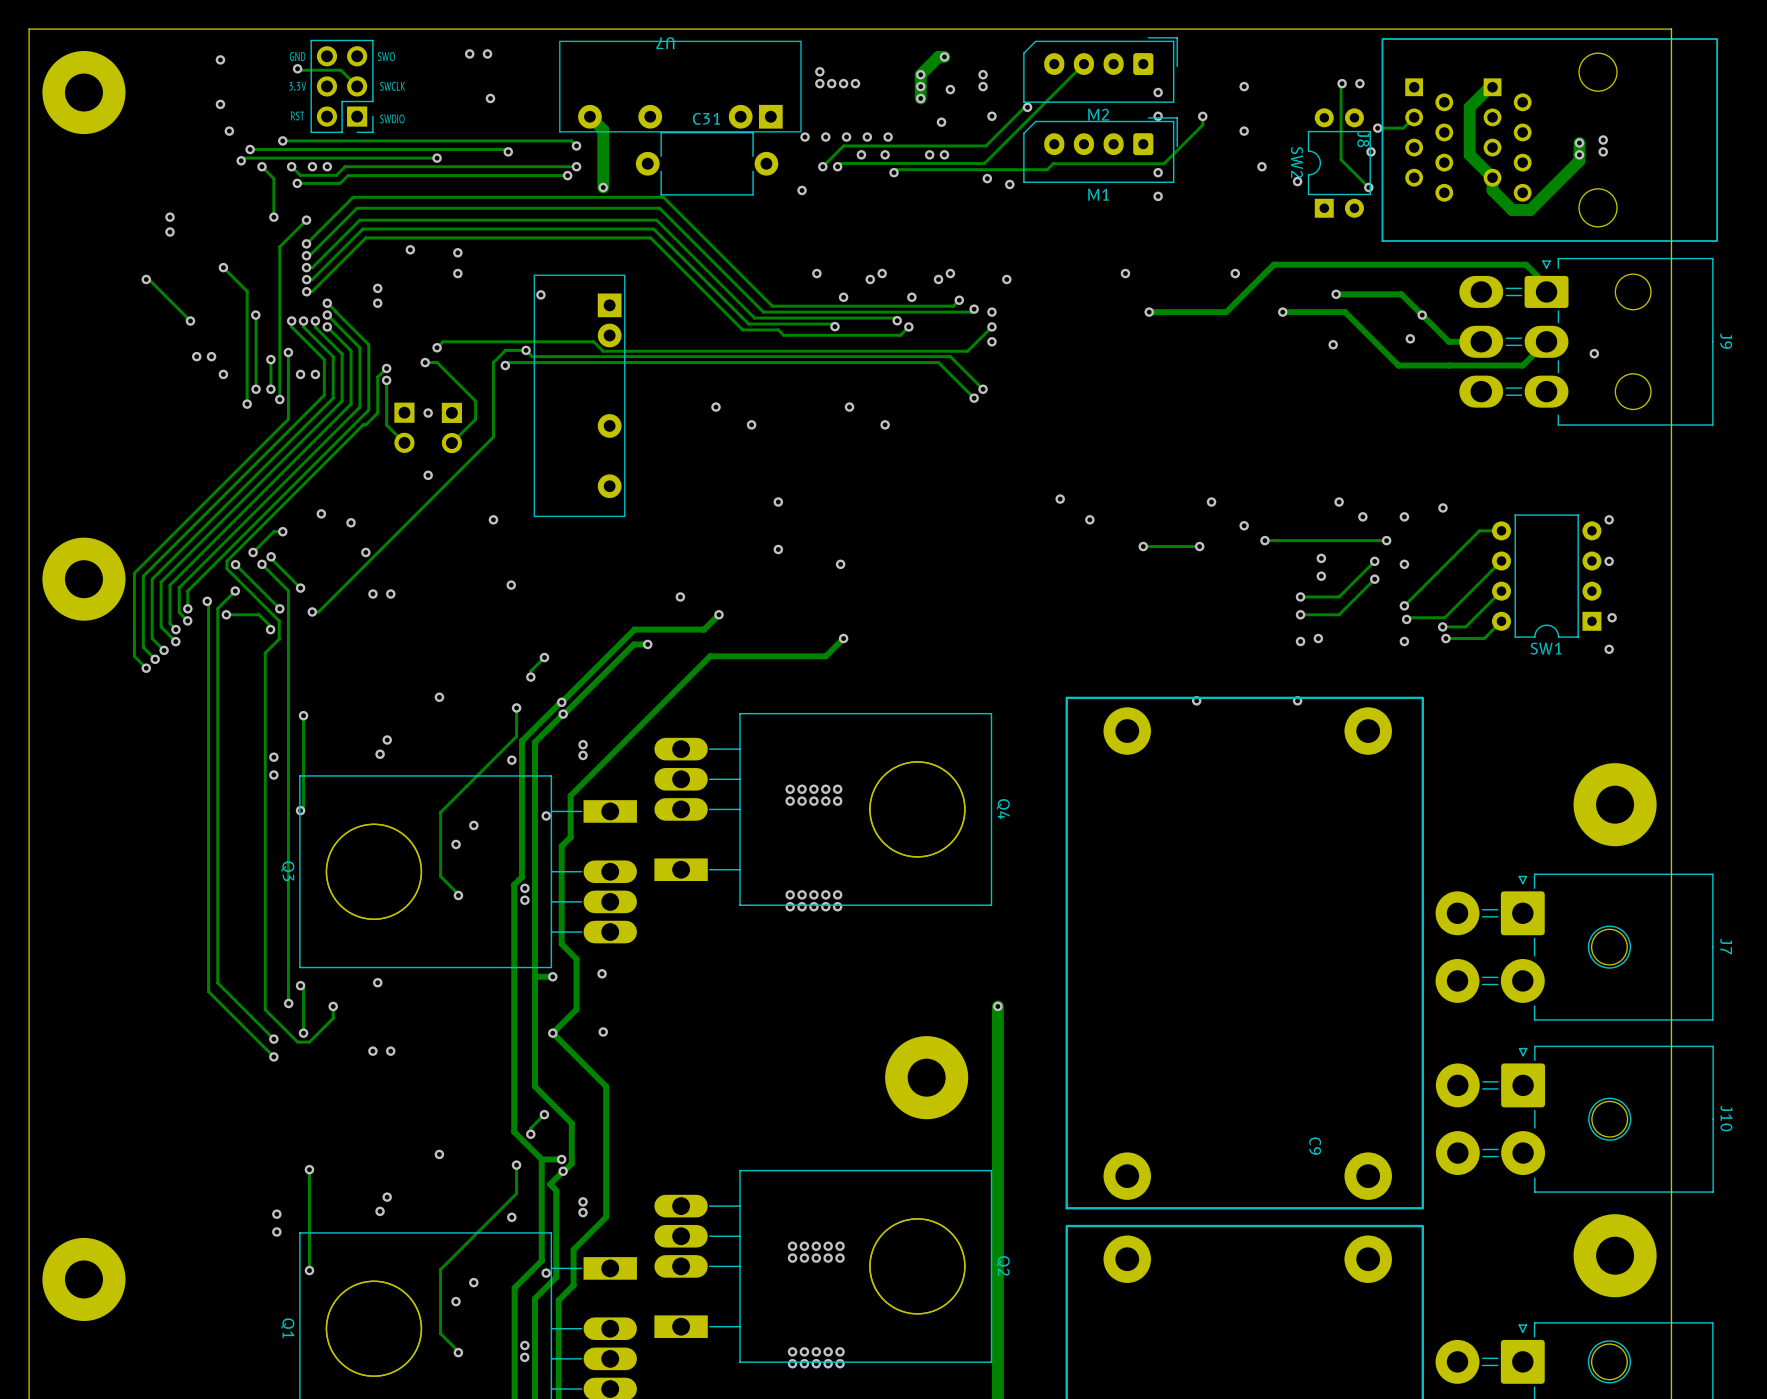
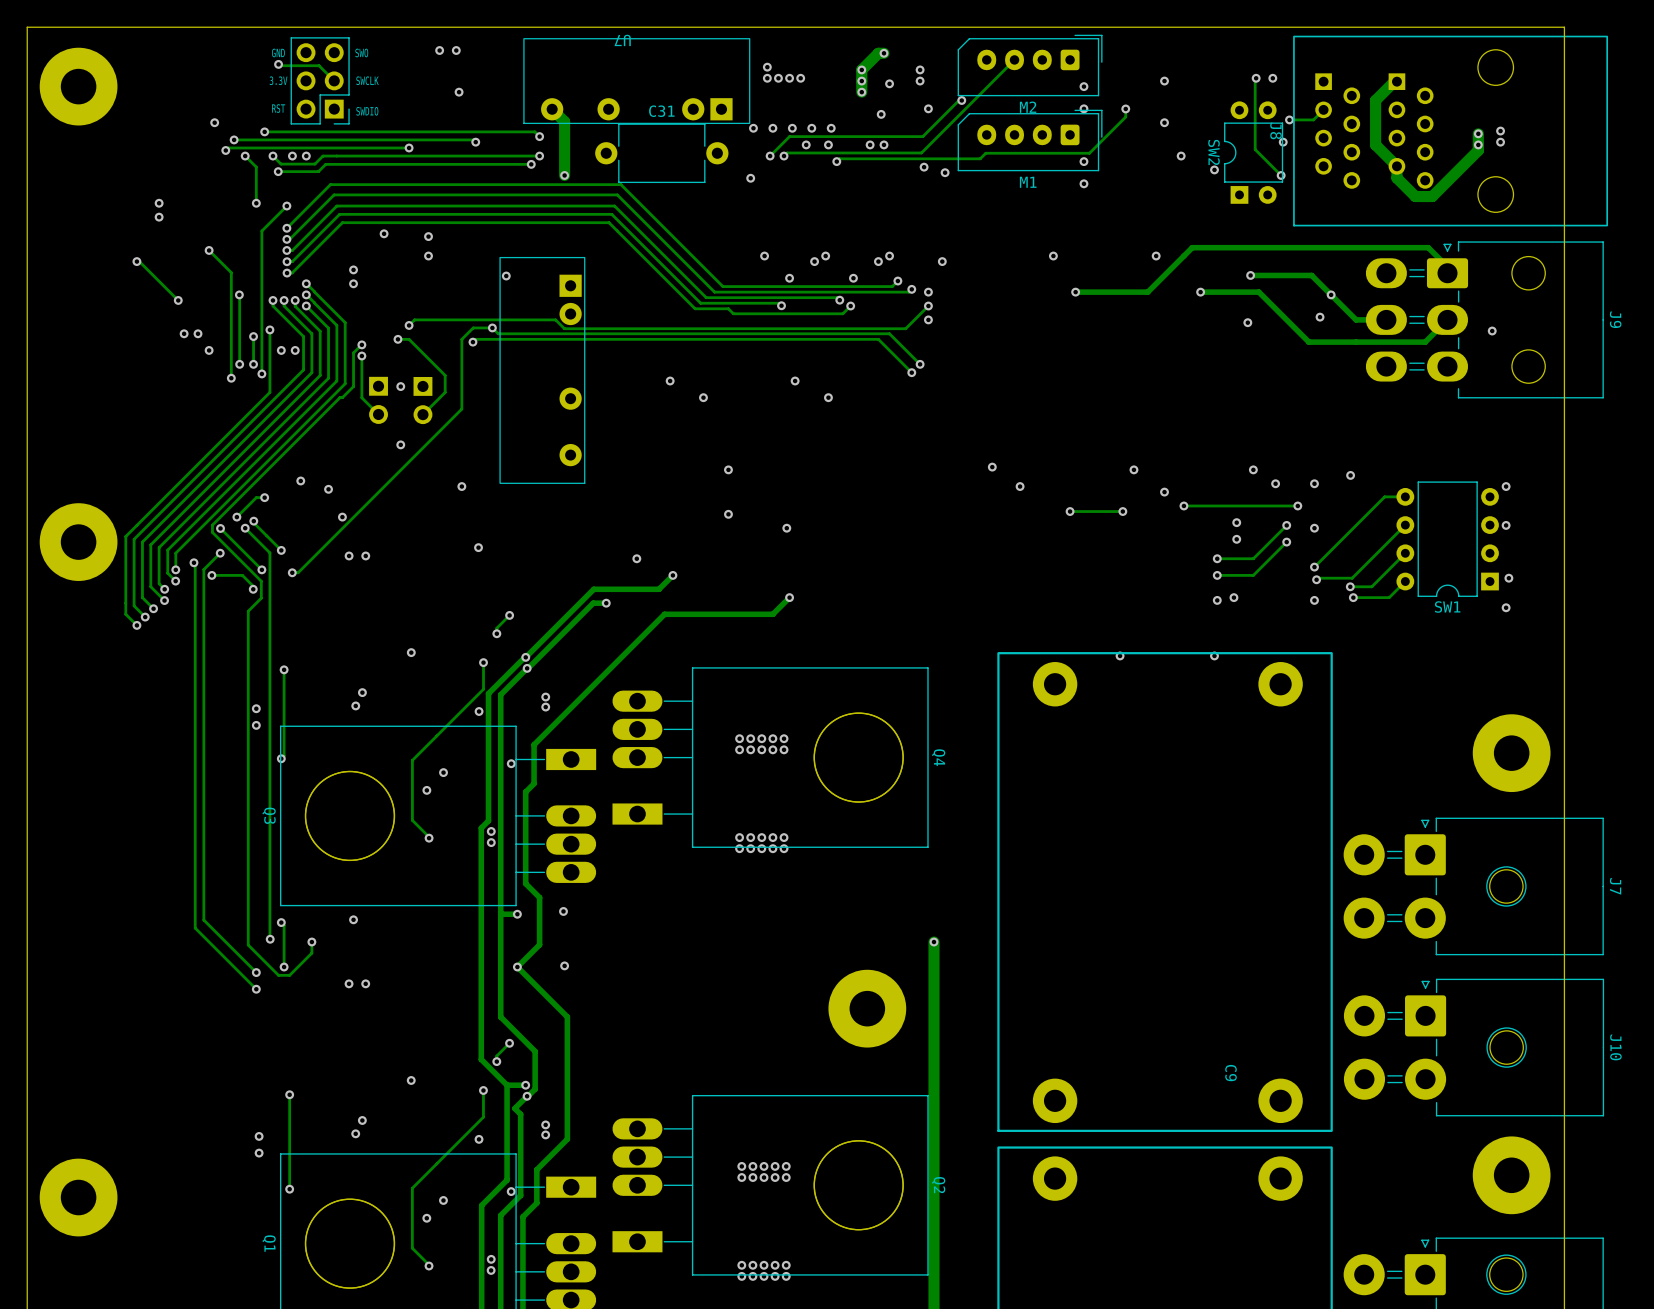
via: (220, 59) -> none
via: (220, 104) -> none

